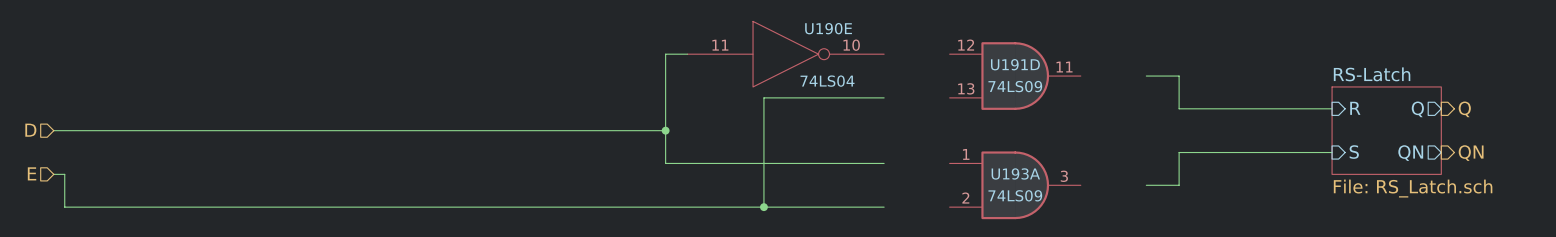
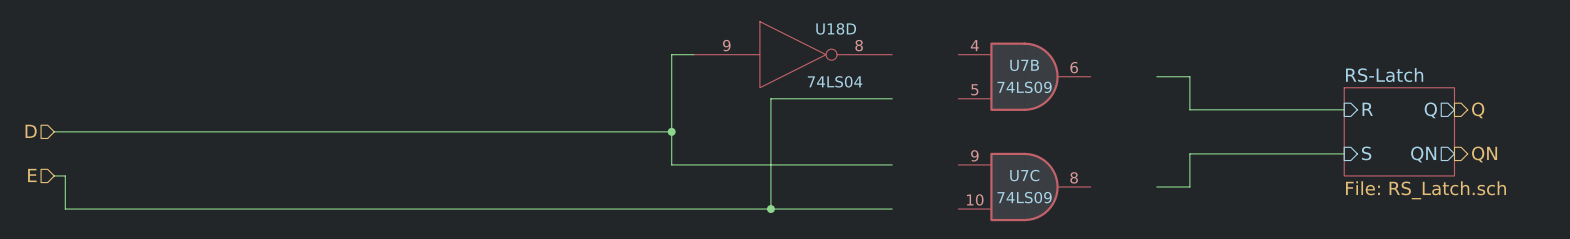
U190E name: U190E (828, 28) -> U18D (836, 28)
U190E pin number: 11 (720, 45) -> 9 (726, 45)
U190E pin number: 10 (851, 45) -> 8 (859, 45)
U191D pin number: 12 (966, 45) -> 4 (974, 45)
U191D name: U191D (1015, 64) -> U7B (1024, 65)
U191D pin number: 11 (1064, 67) -> 6 (1074, 67)
U191D pin number: 13 (966, 88) -> 5 (974, 89)
U193A pin number: 1 (966, 154) -> 9 (974, 155)
U193A name: U193A (1015, 173) -> U7C (1024, 175)
U193A pin number: 3 (1064, 176) -> 8 (1074, 177)
U193A pin number: 2 (965, 198) -> 10 (975, 199)

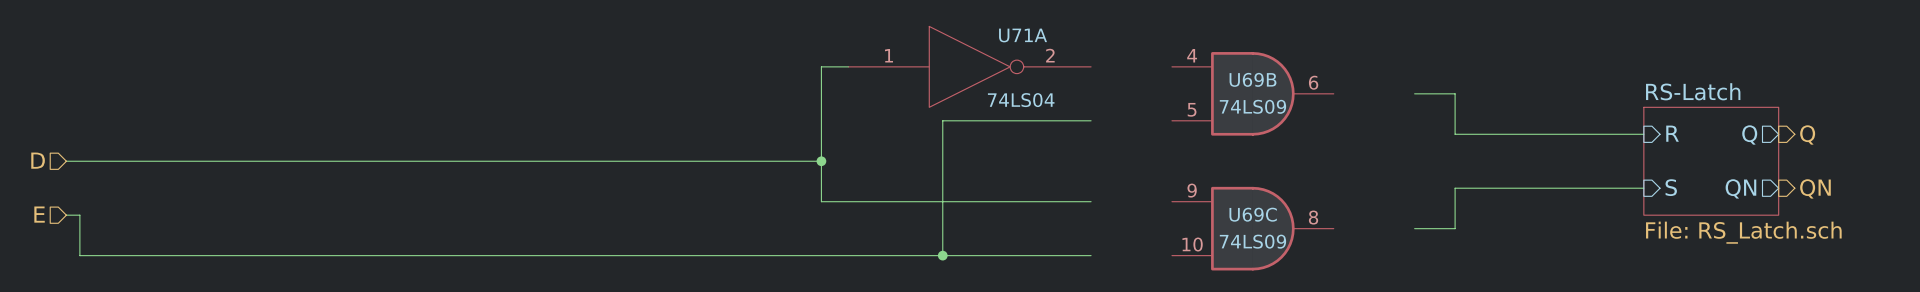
U18D name: U18D (836, 28) -> U71A (1023, 35)
U18D pin number: 9 (726, 45) -> 1 (888, 55)
U18D pin number: 8 (859, 45) -> 2 (1050, 55)
U7B name: U7B (1024, 65) -> U69B (1253, 79)
U7C name: U7C (1024, 175) -> U69C (1253, 214)

